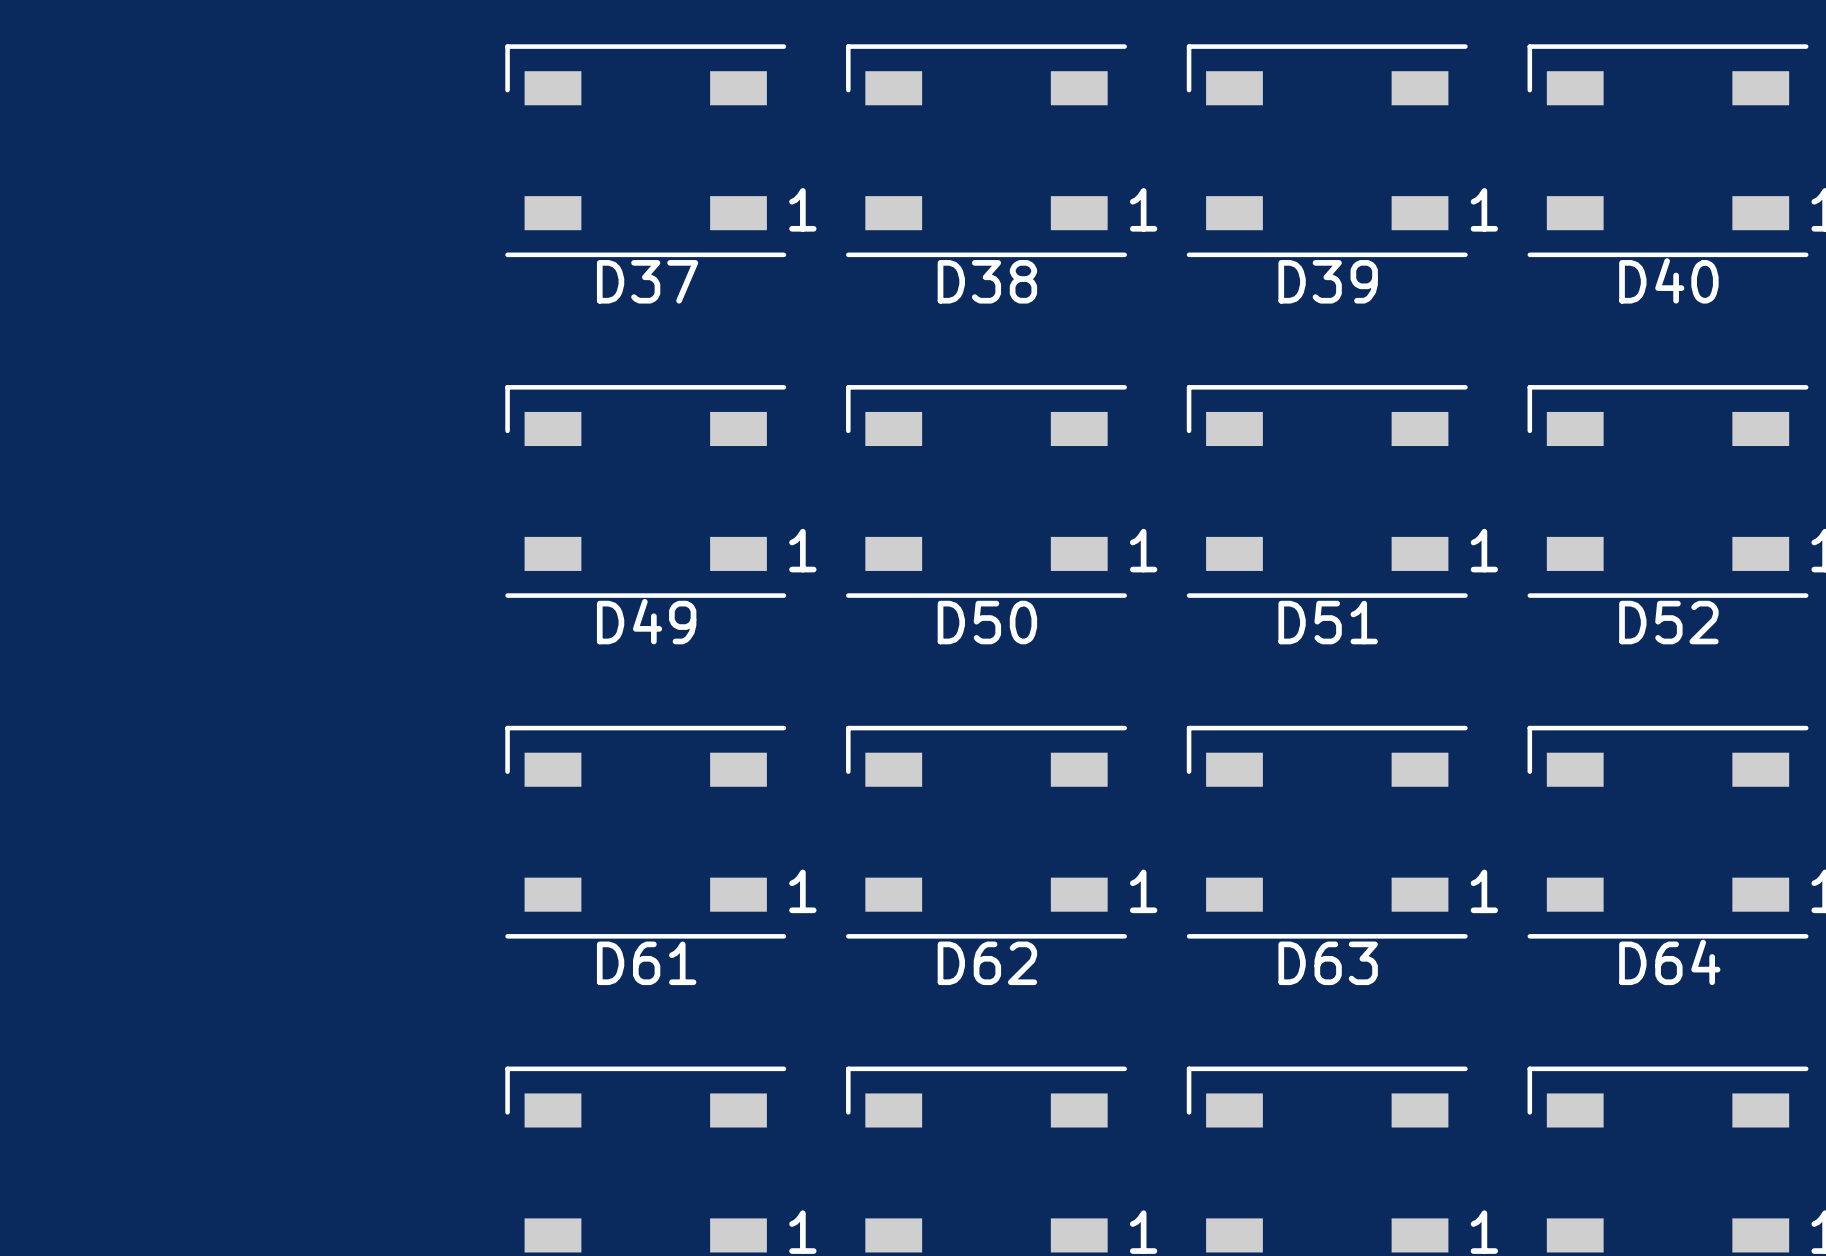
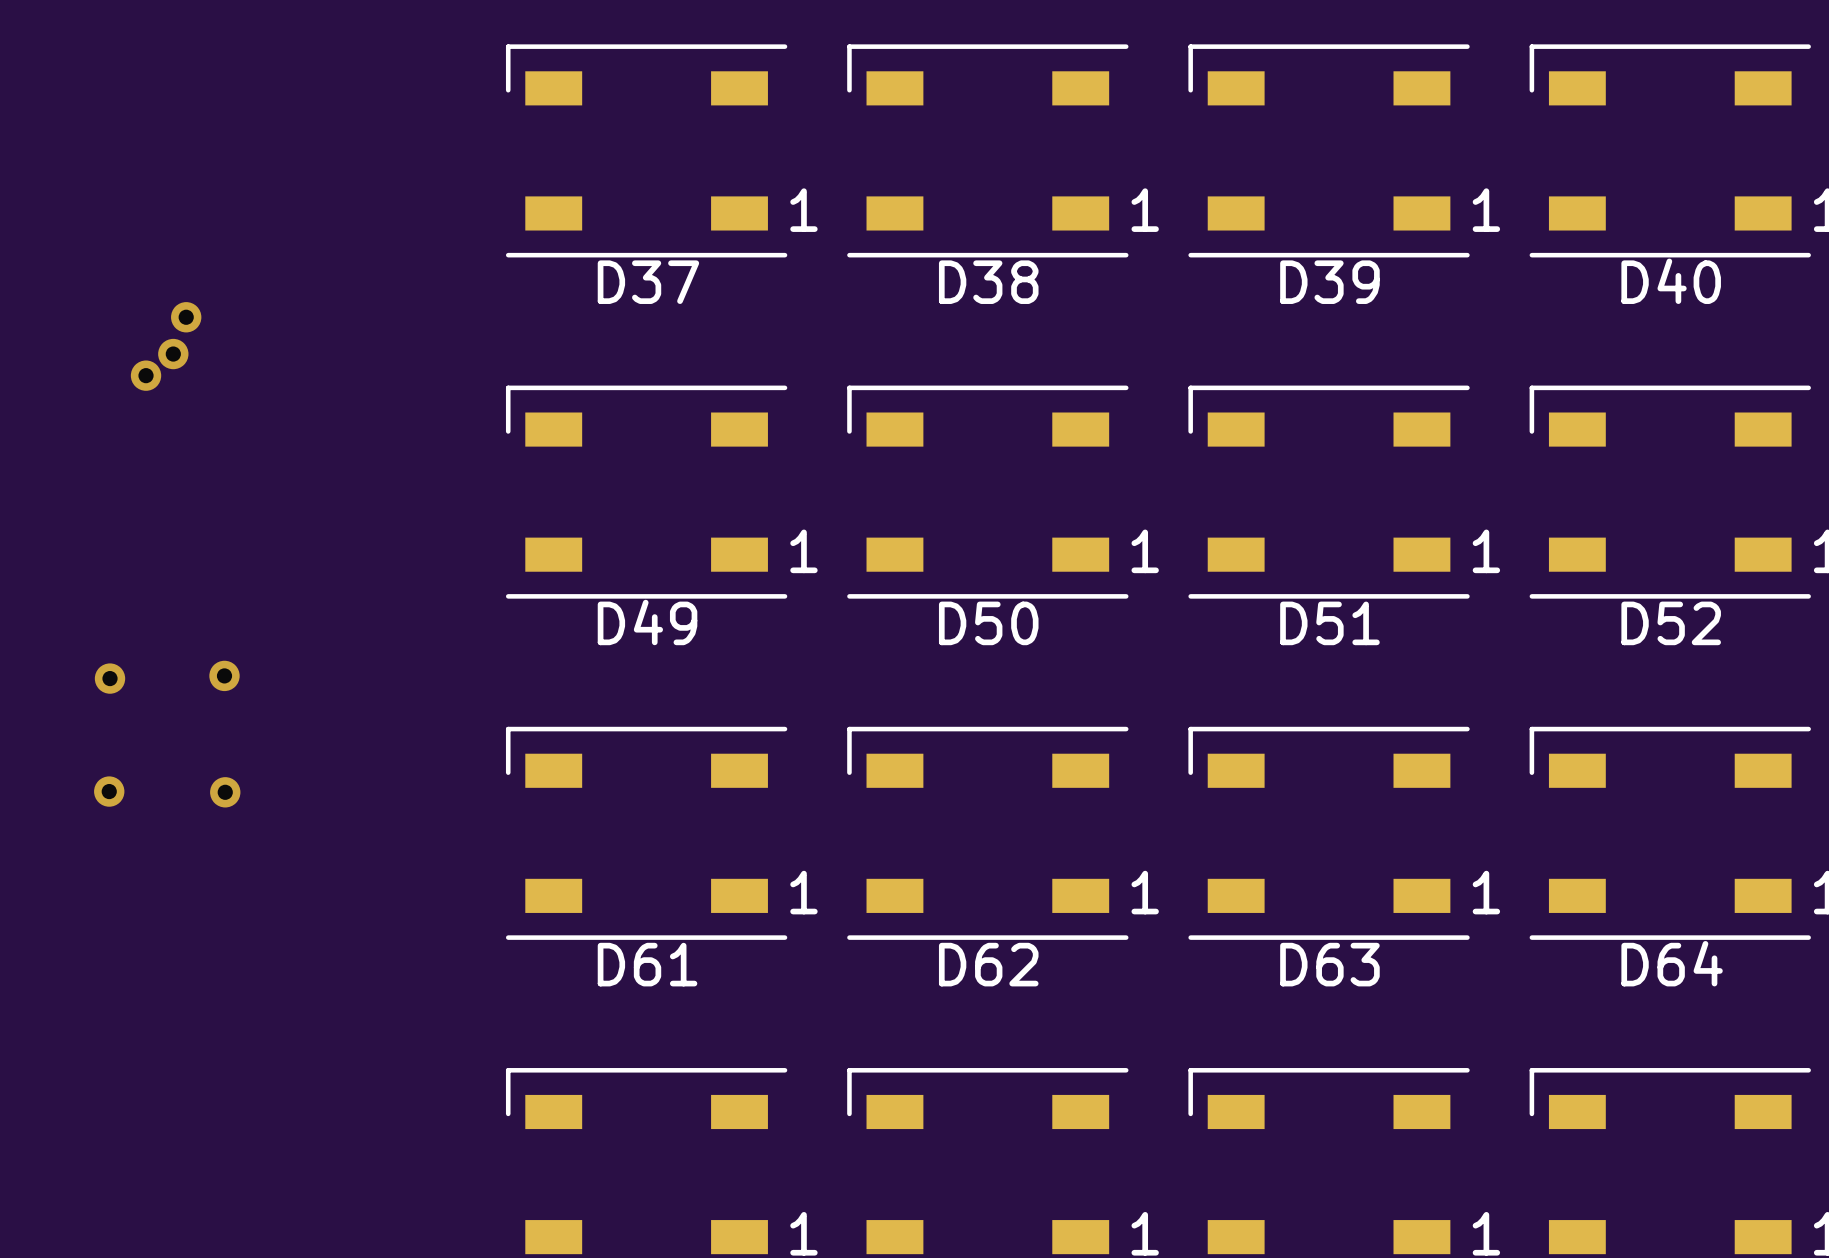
via: none -> (186, 317)
via: none -> (173, 354)
via: none -> (146, 375)
via: none -> (224, 675)
via: none -> (110, 678)
via: none -> (109, 791)
via: none -> (225, 792)

